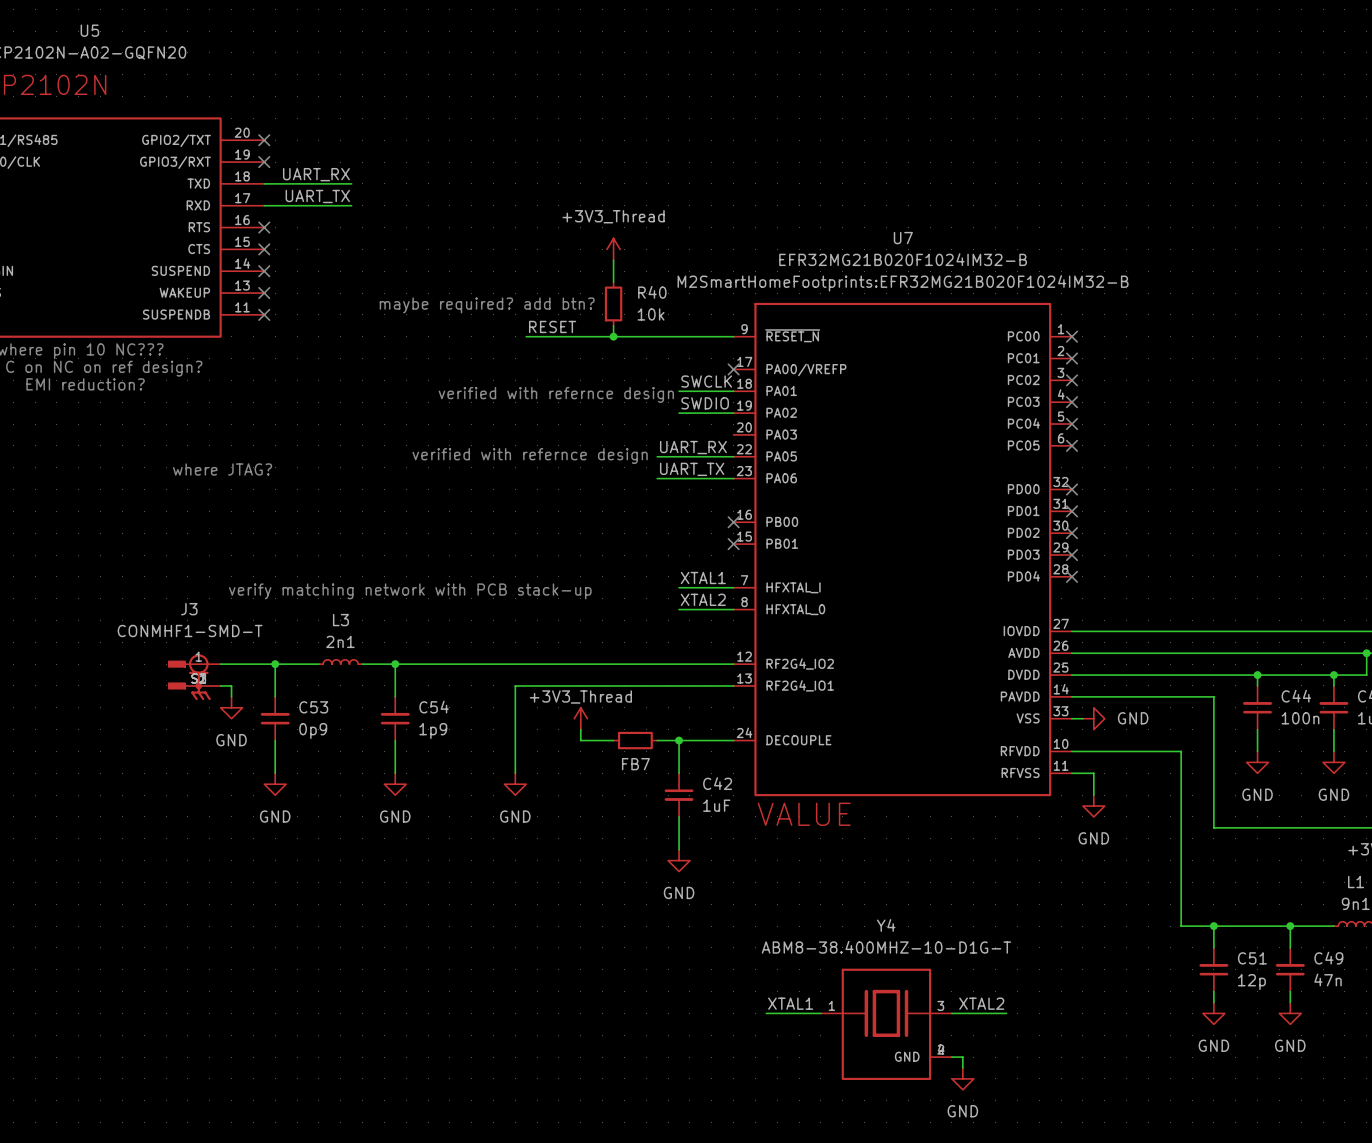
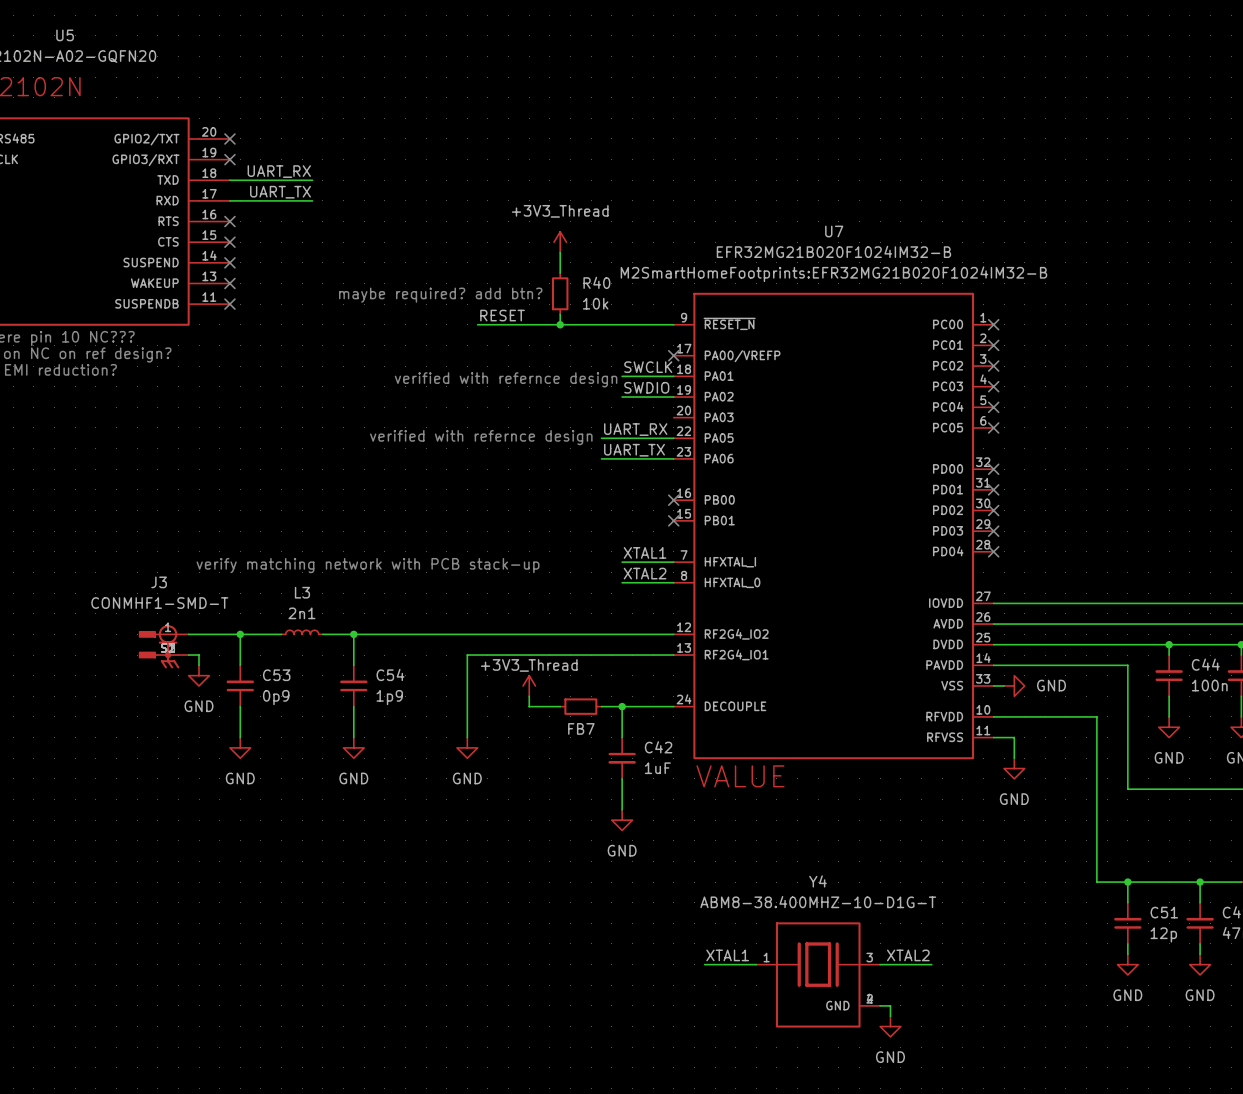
text: where JTAG? (222, 469) -> none

